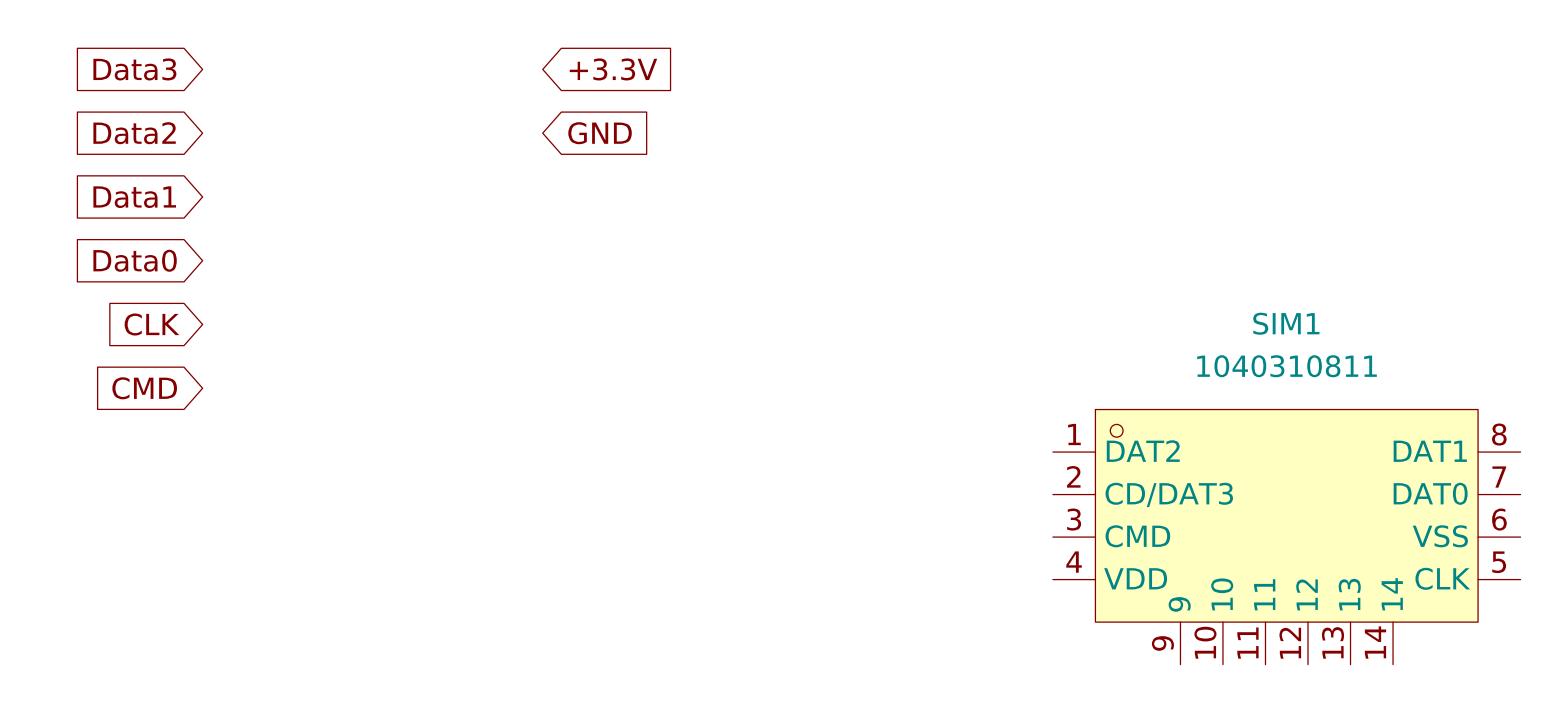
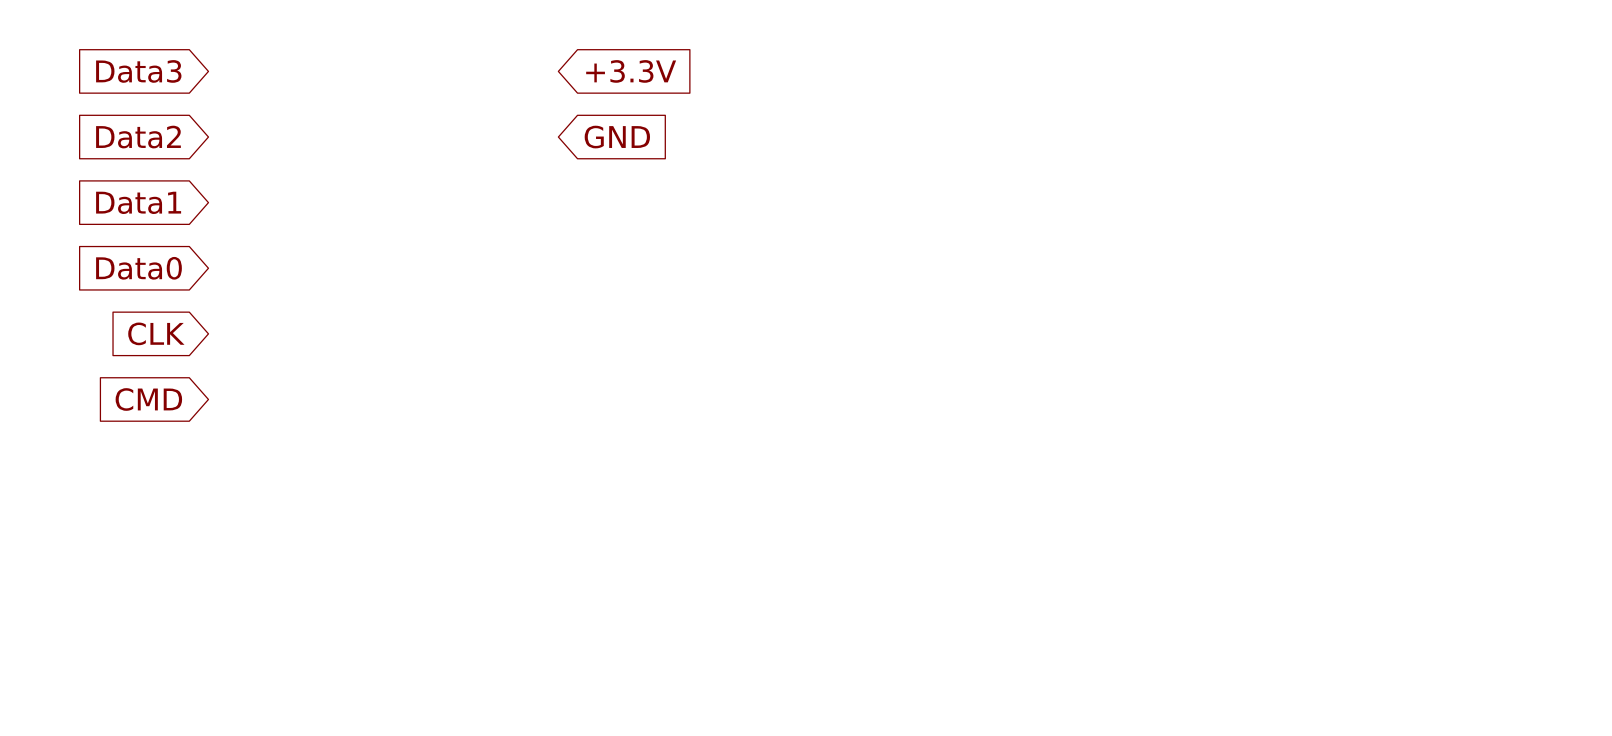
SIM1: 1040310811 (1286, 537) -> none

